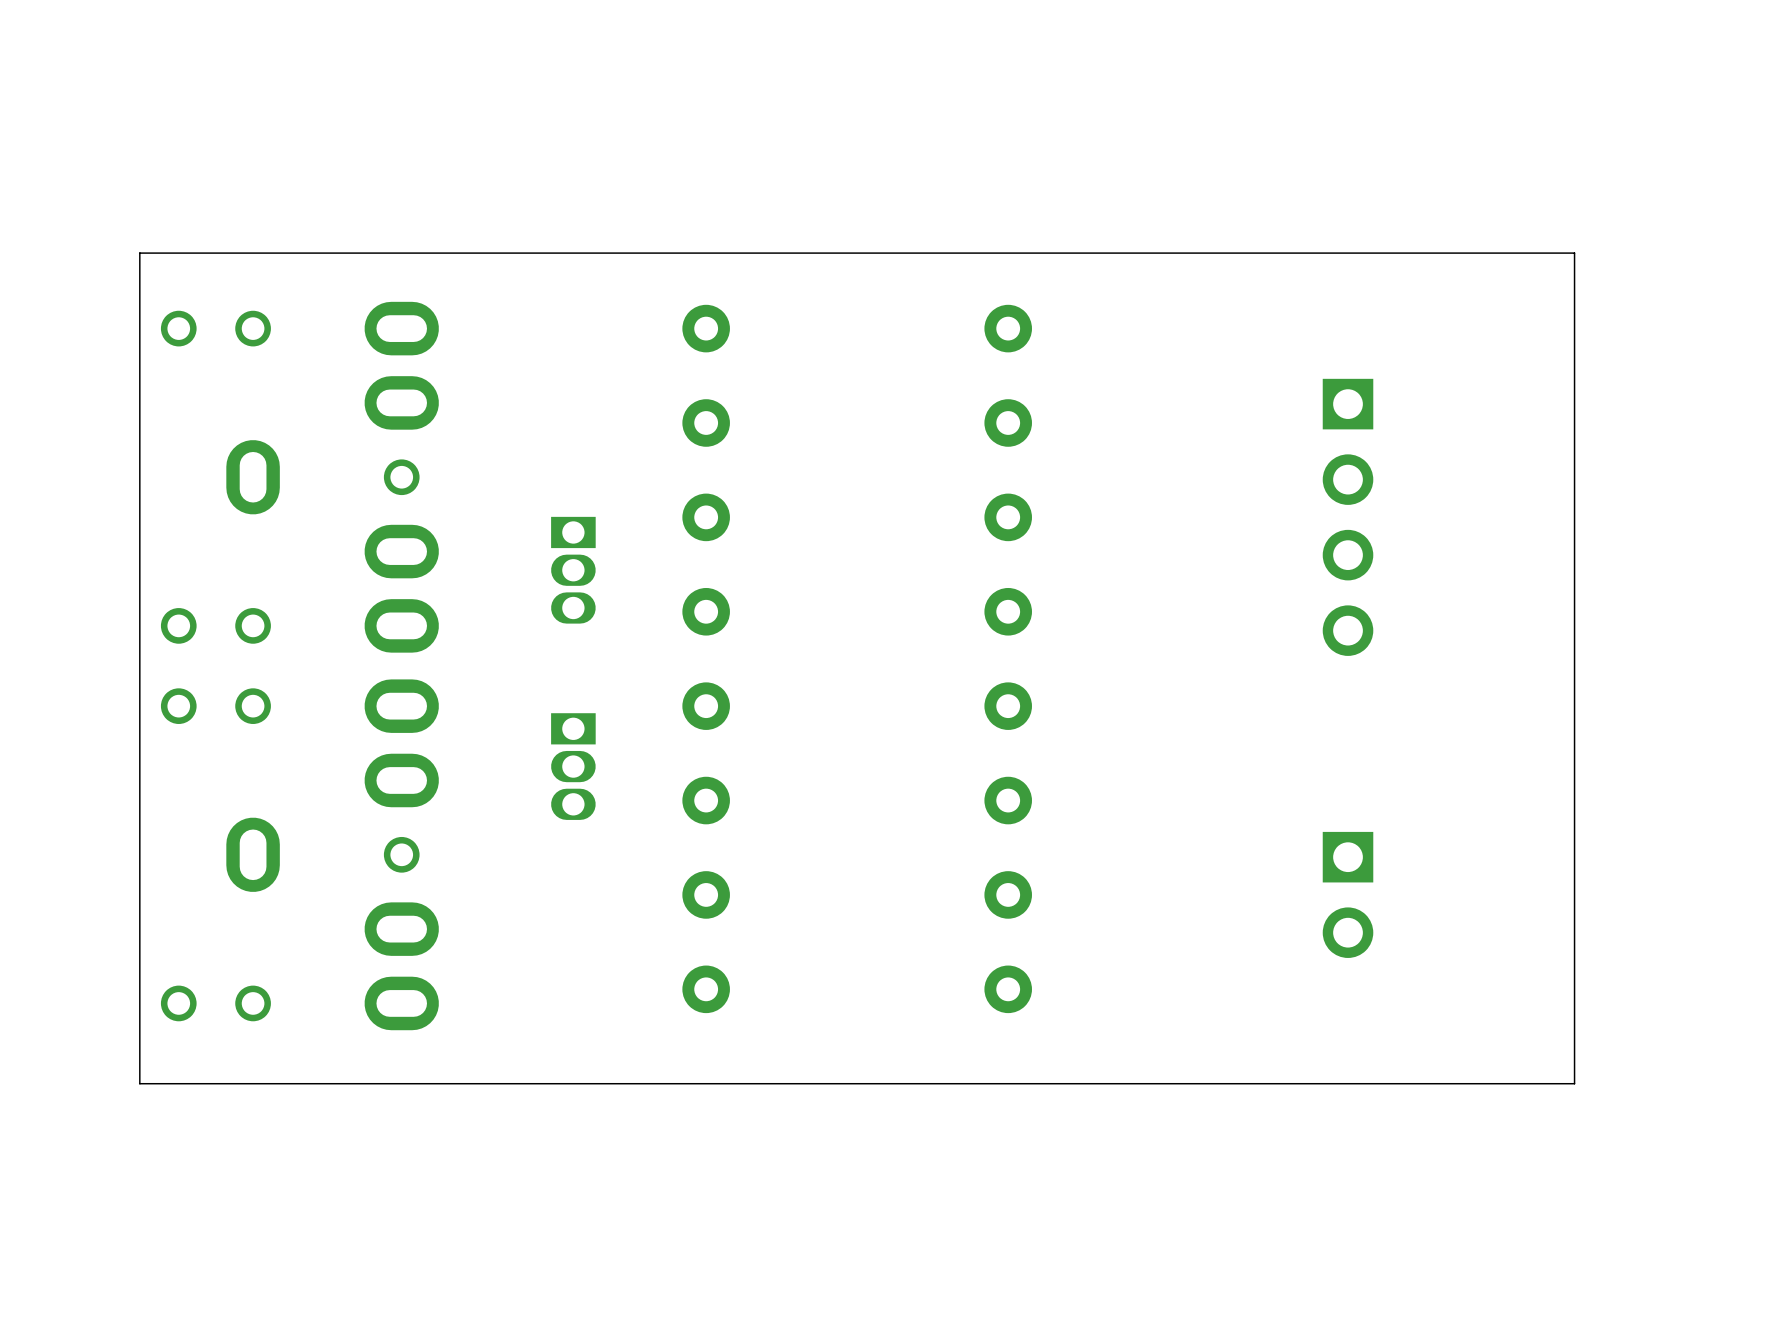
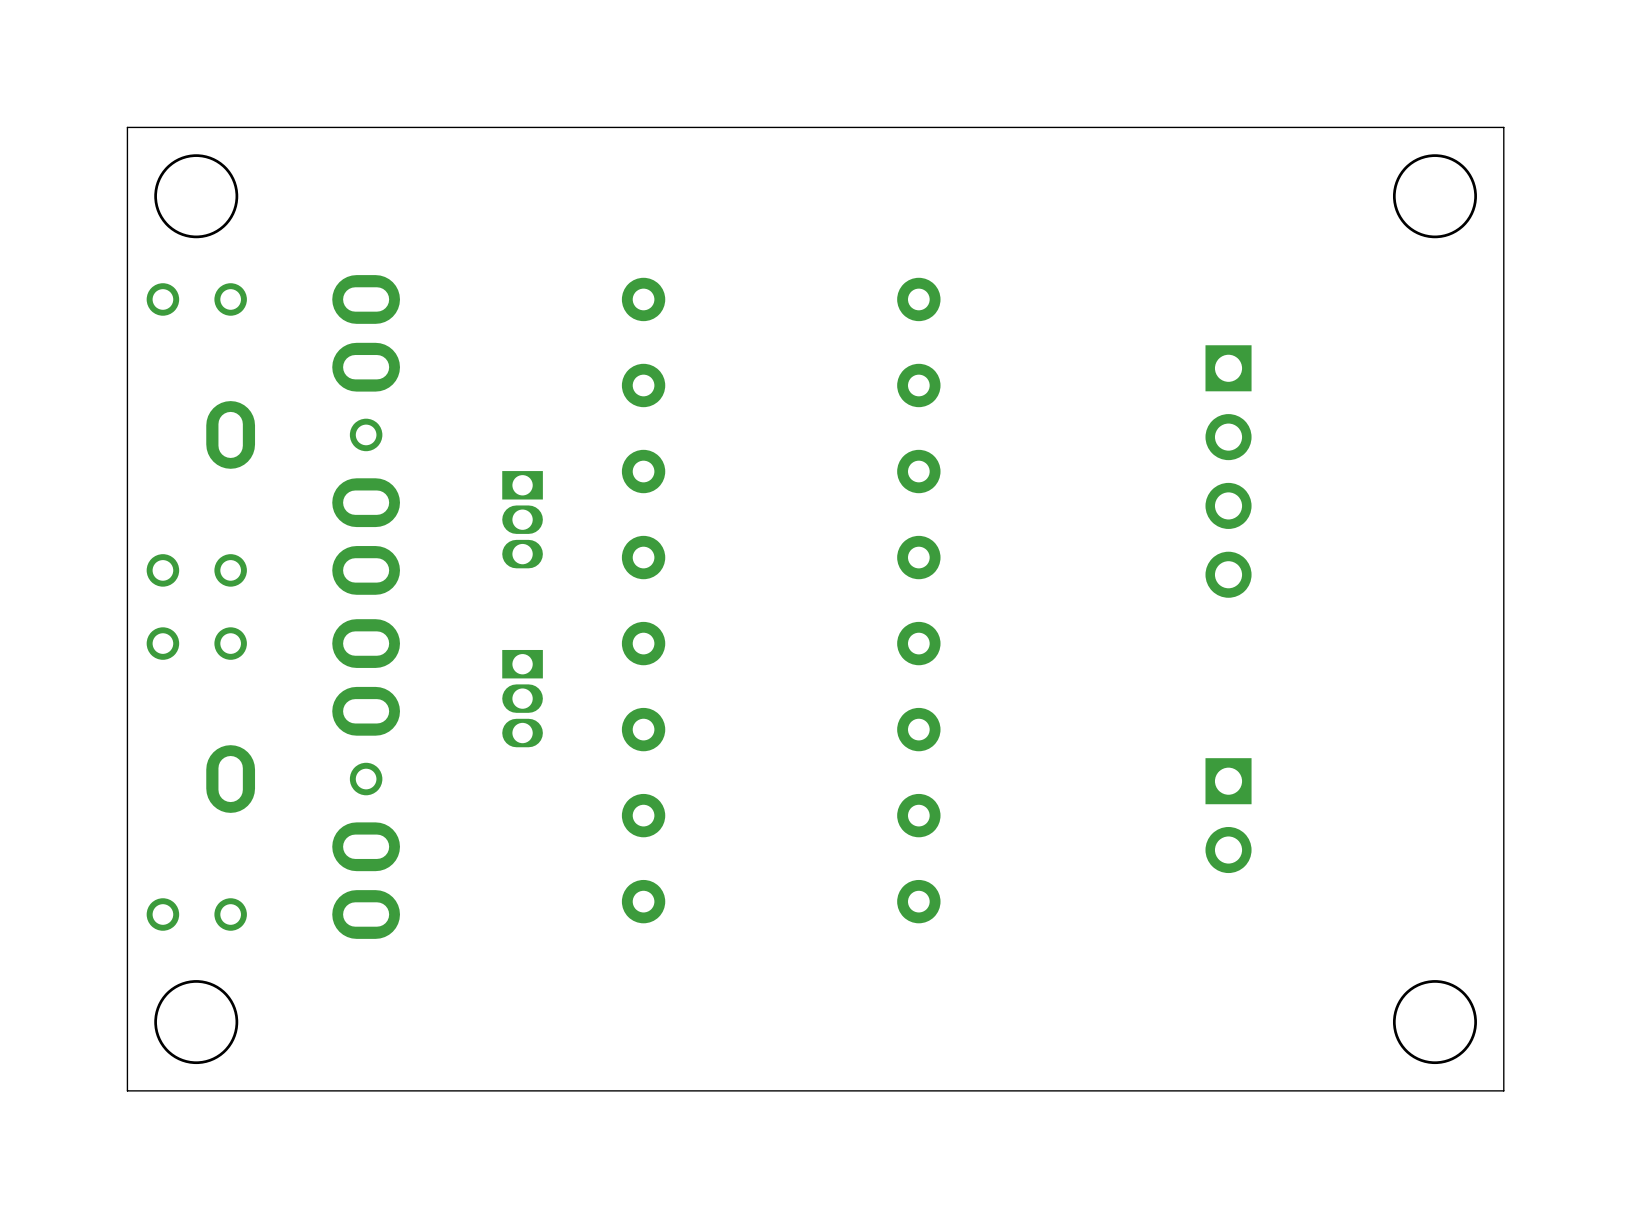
round board edge: none -> [154, 154, 239, 239]
round board edge: none -> [1392, 154, 1477, 239]
board edge: (139, 253) (1574, 253) (1574, 1083) (139, 1083) -> (127, 230) (127, 127) (1503, 127) (1503, 1090) (127, 1090) (127, 987)
round board edge: none -> [154, 980, 239, 1065]
round board edge: none -> [1392, 980, 1477, 1065]

